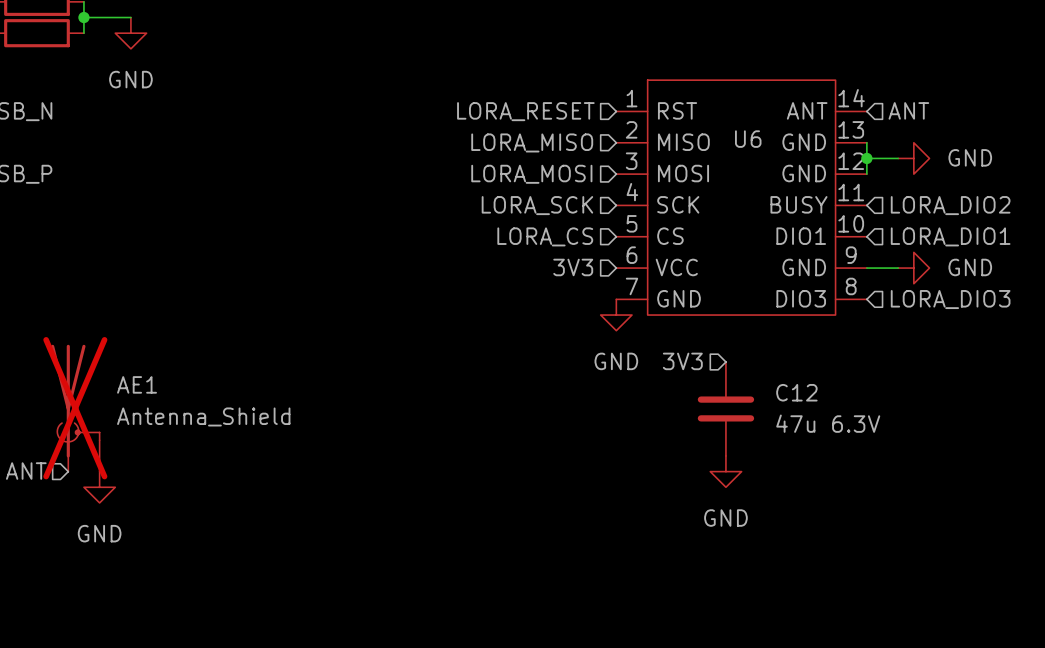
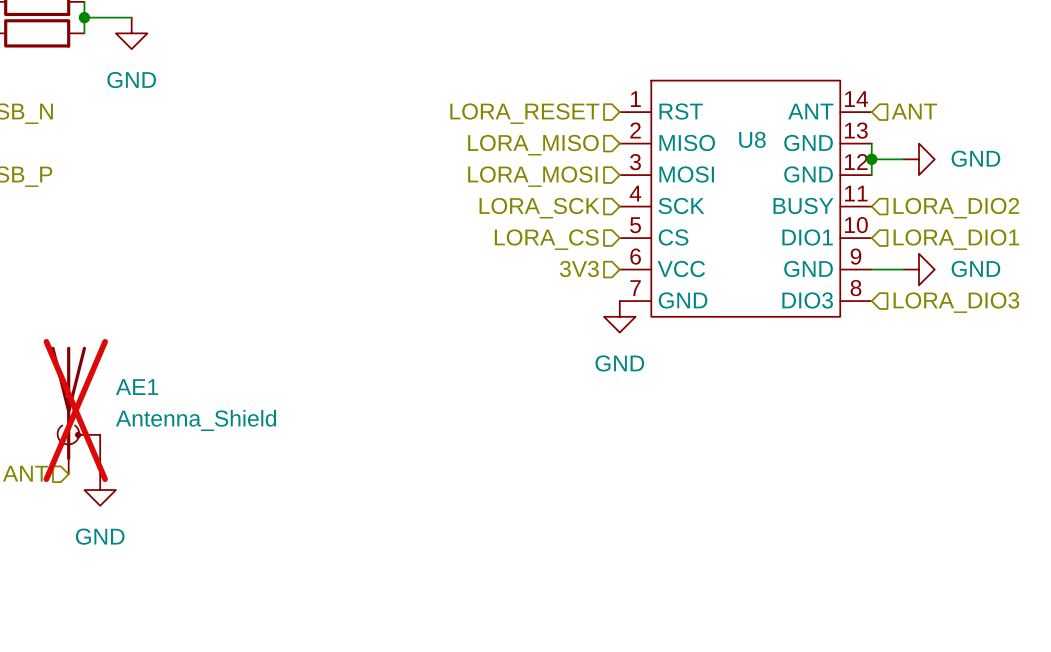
U6 name: U6 (748, 139) -> U8 (752, 139)
hierarchical label: 3V3 (682, 361) -> none
C12: 47u 6.3V (725, 408) -> none
power symbol: GND (725, 471) -> none

